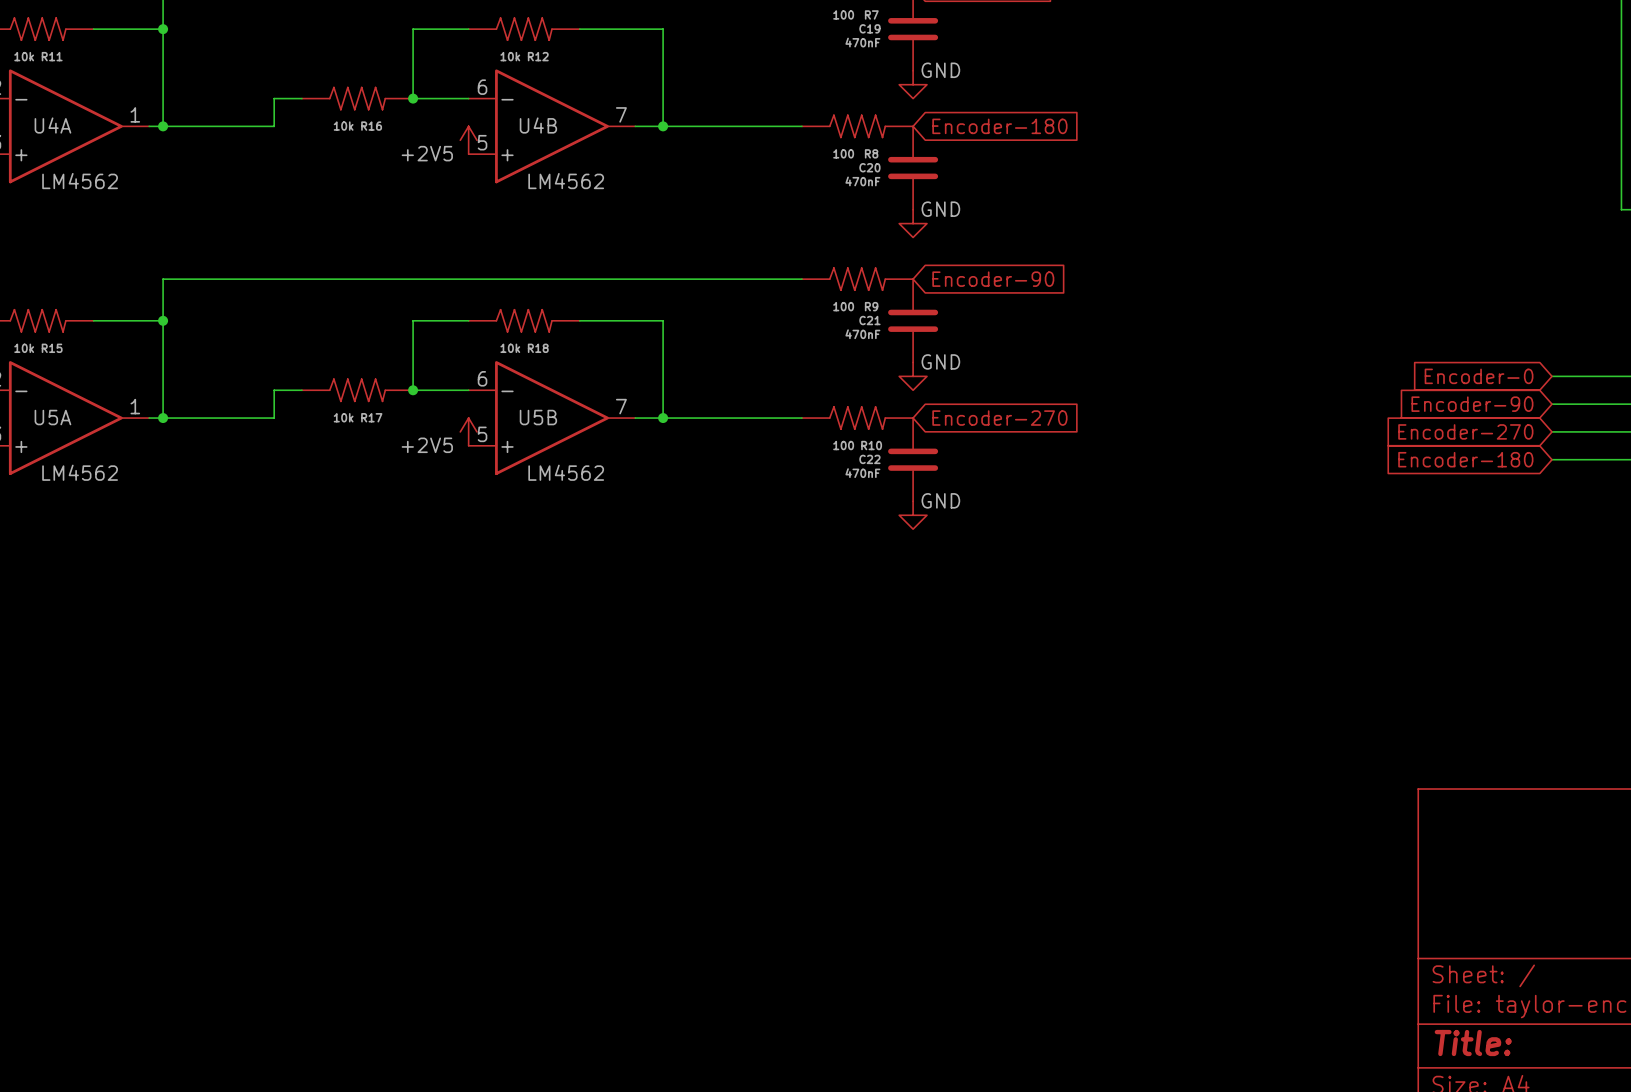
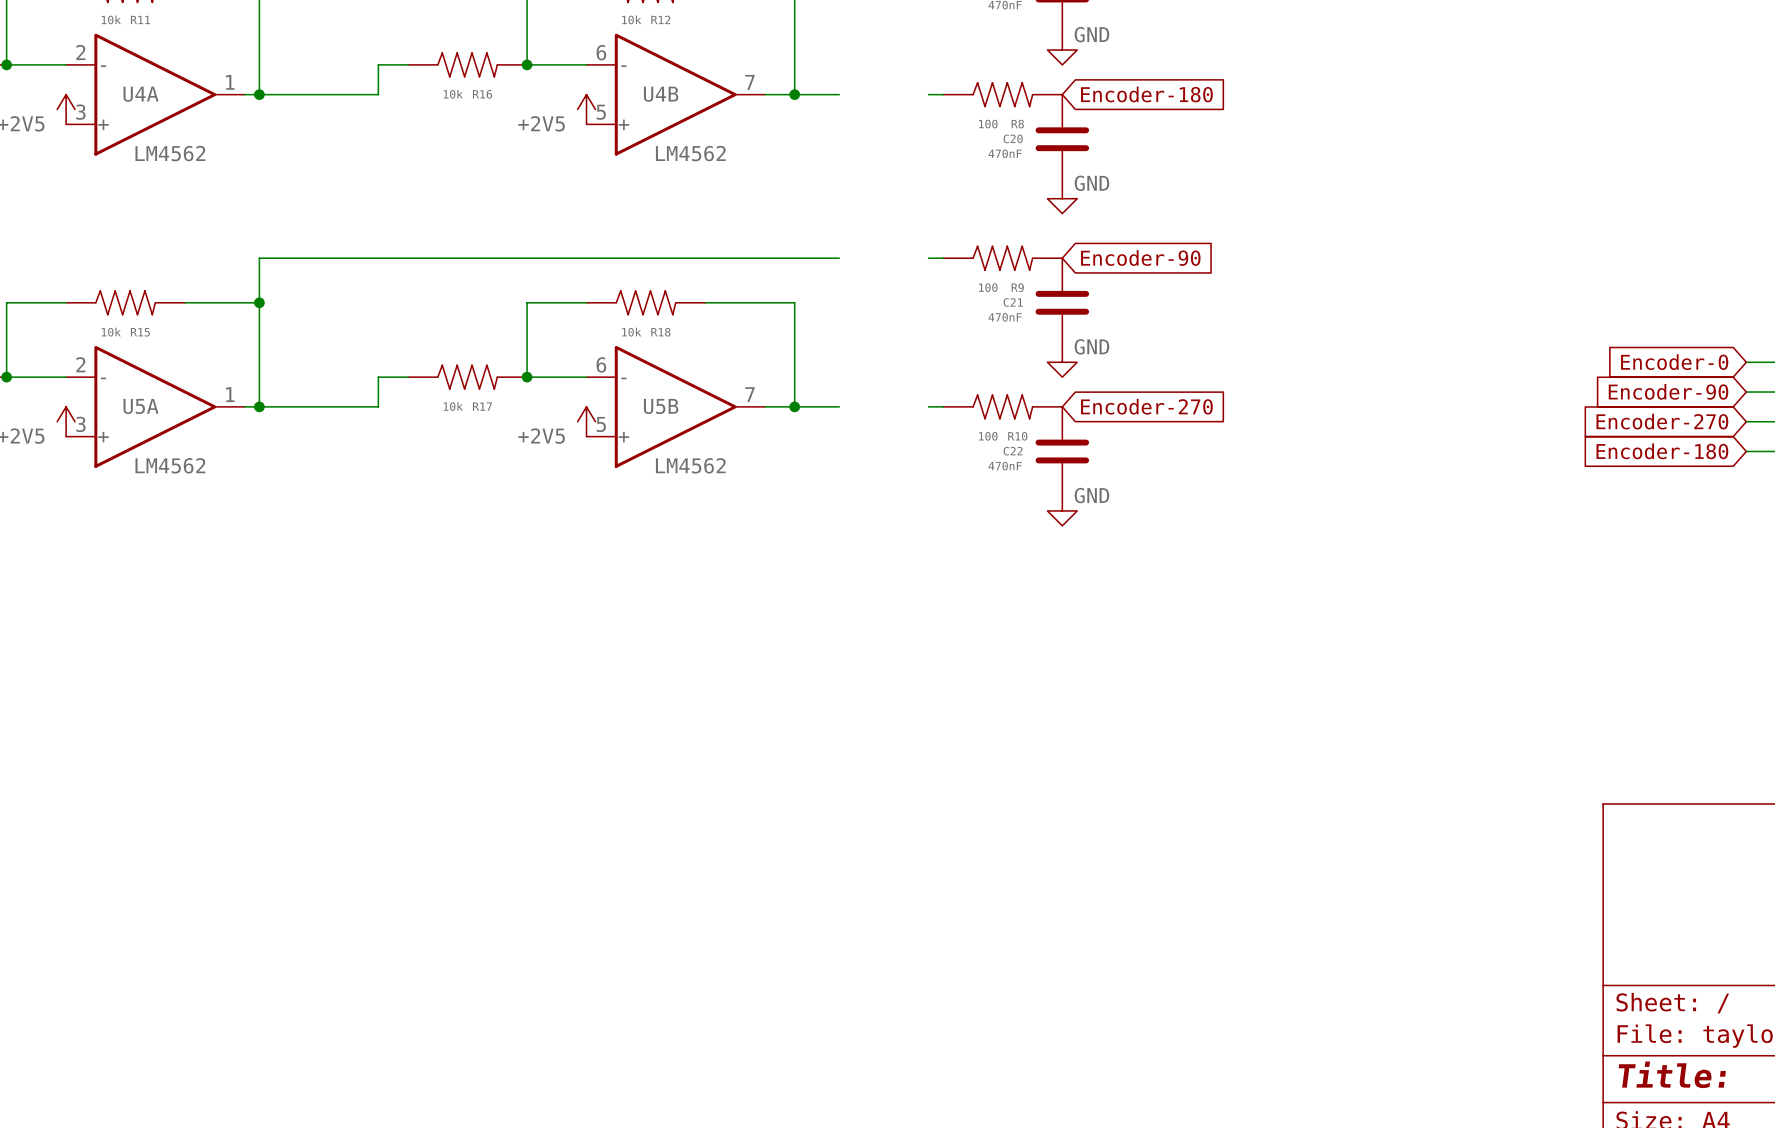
wire: (704, 126) (788, 126) -> none
wire: (704, 279) (788, 279) -> none
wire: (704, 418) (788, 418) -> none

